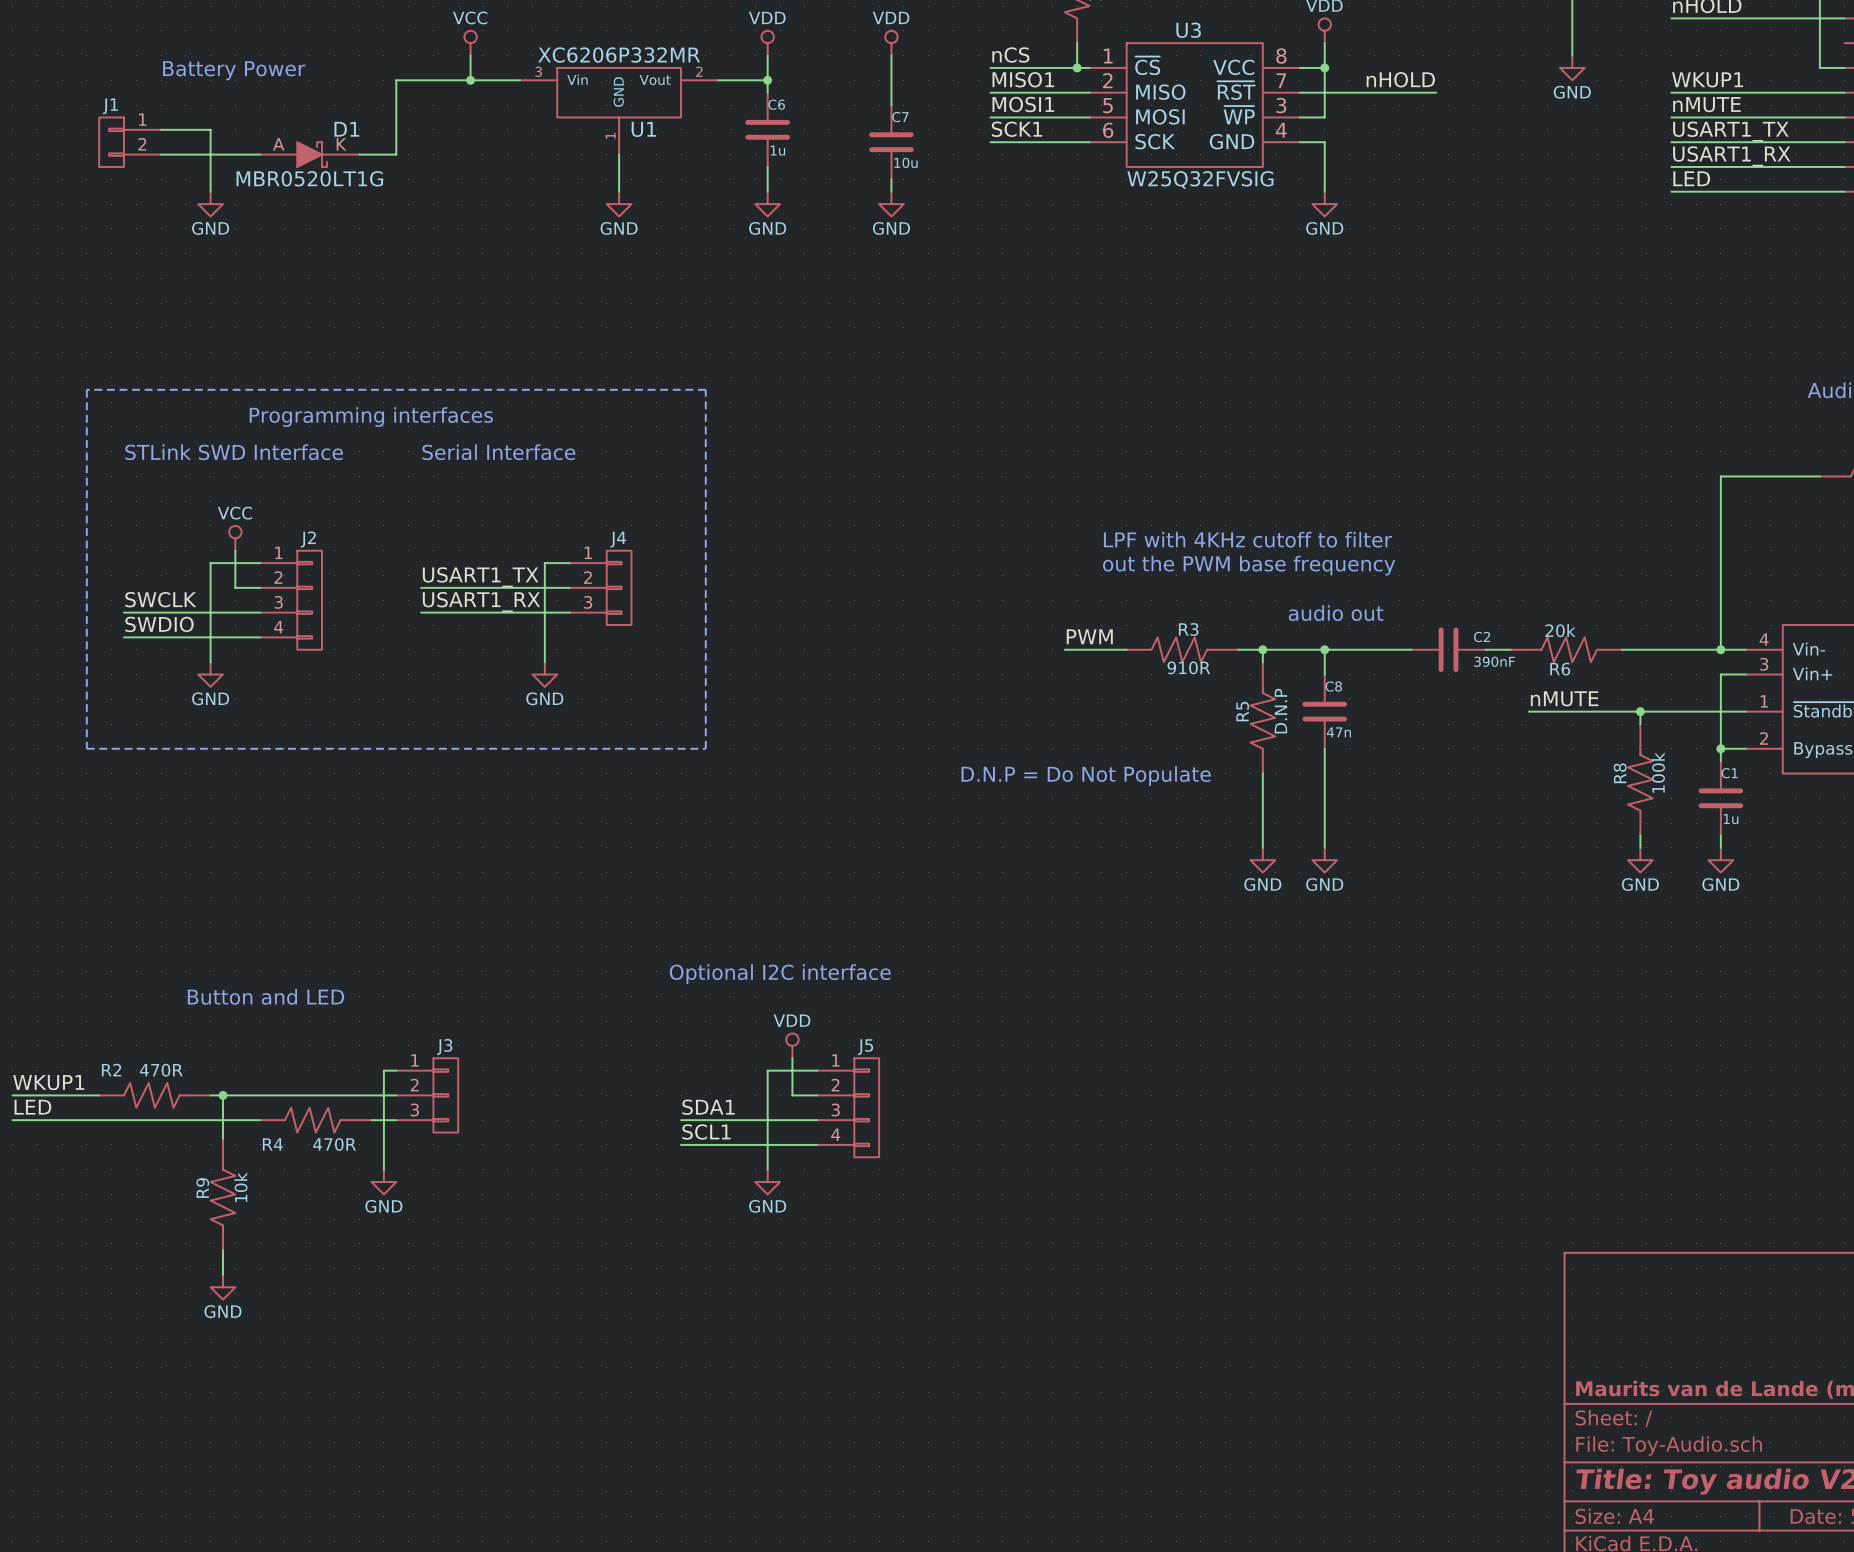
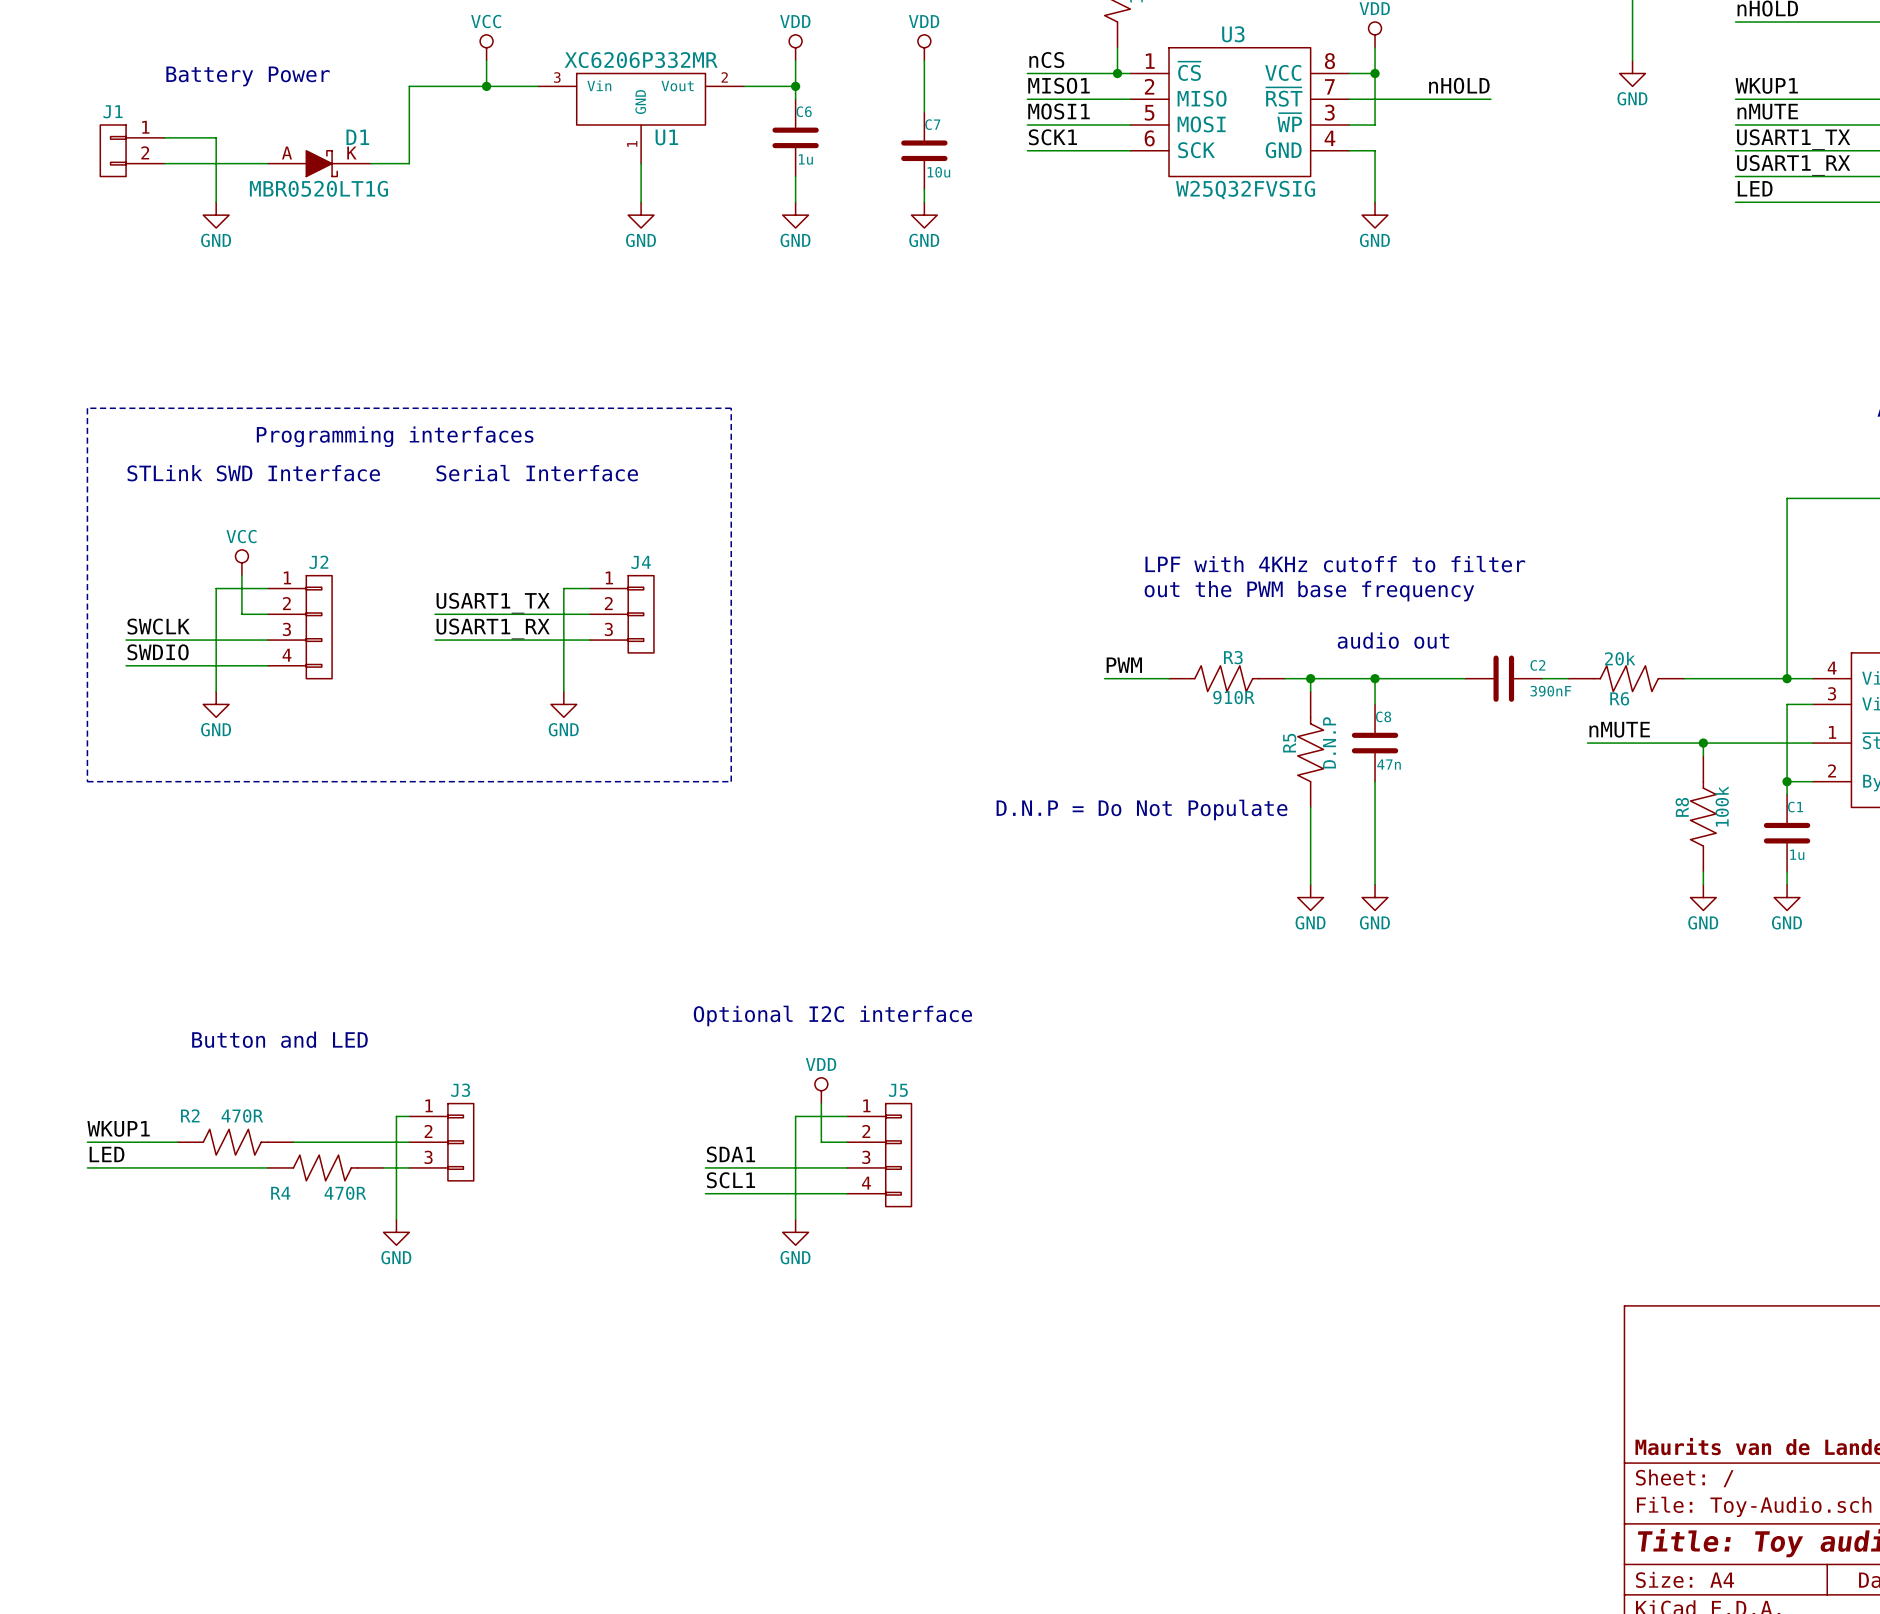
label position: WKUP1 (48, 1082) -> WKUP1 (118, 1128)
wire: (12, 1095) (86, 1095) -> (100, 1142) (177, 1142)
R2 position: (154, 1095) -> (235, 1142)
wire: (222, 1095) (222, 1138) -> none
junction: (222, 1095) -> none
label position: LED (32, 1107) -> LED (107, 1154)
wire: (12, 1120) (86, 1120) -> none
R9: 10k (222, 1194) -> none
wire: (222, 1250) (222, 1274) -> none
power symbol: GND (222, 1287) -> none

